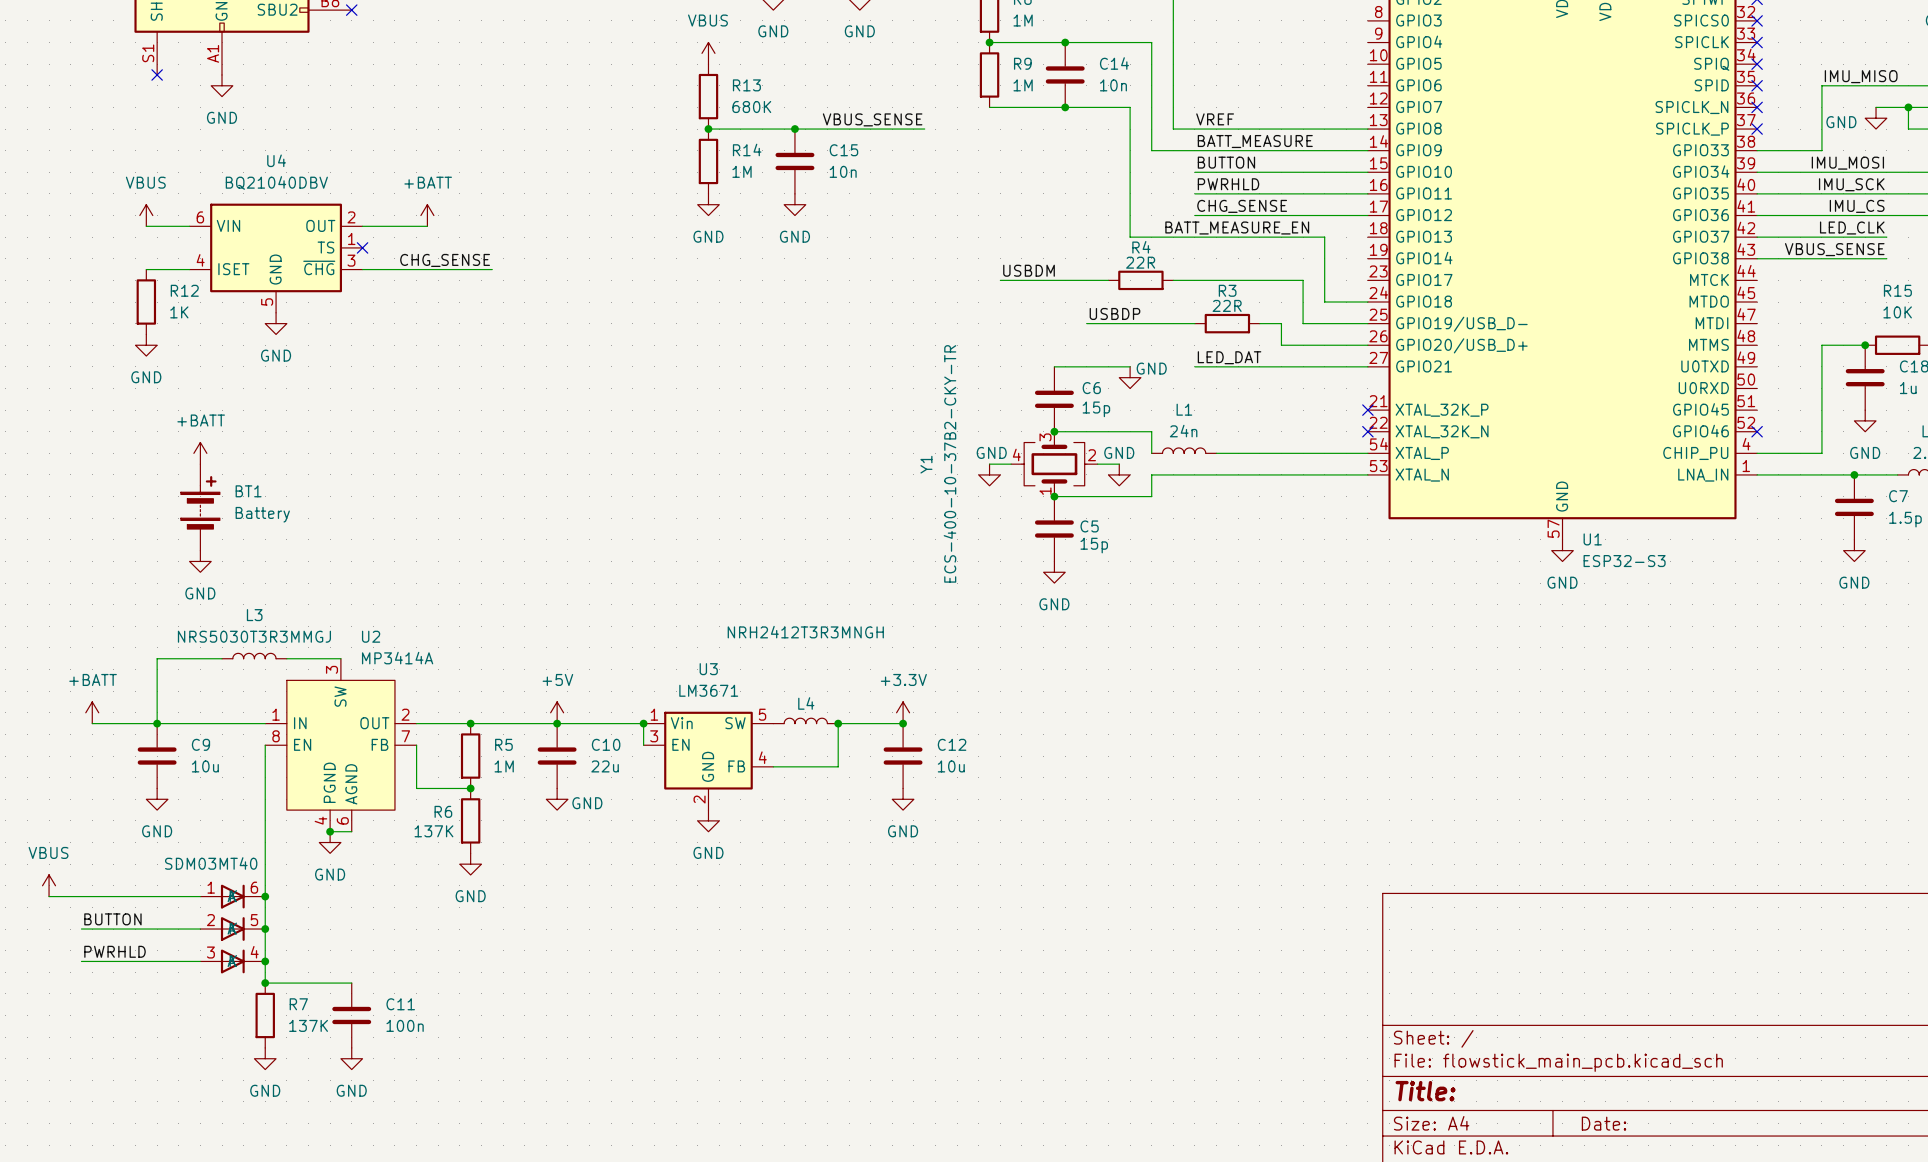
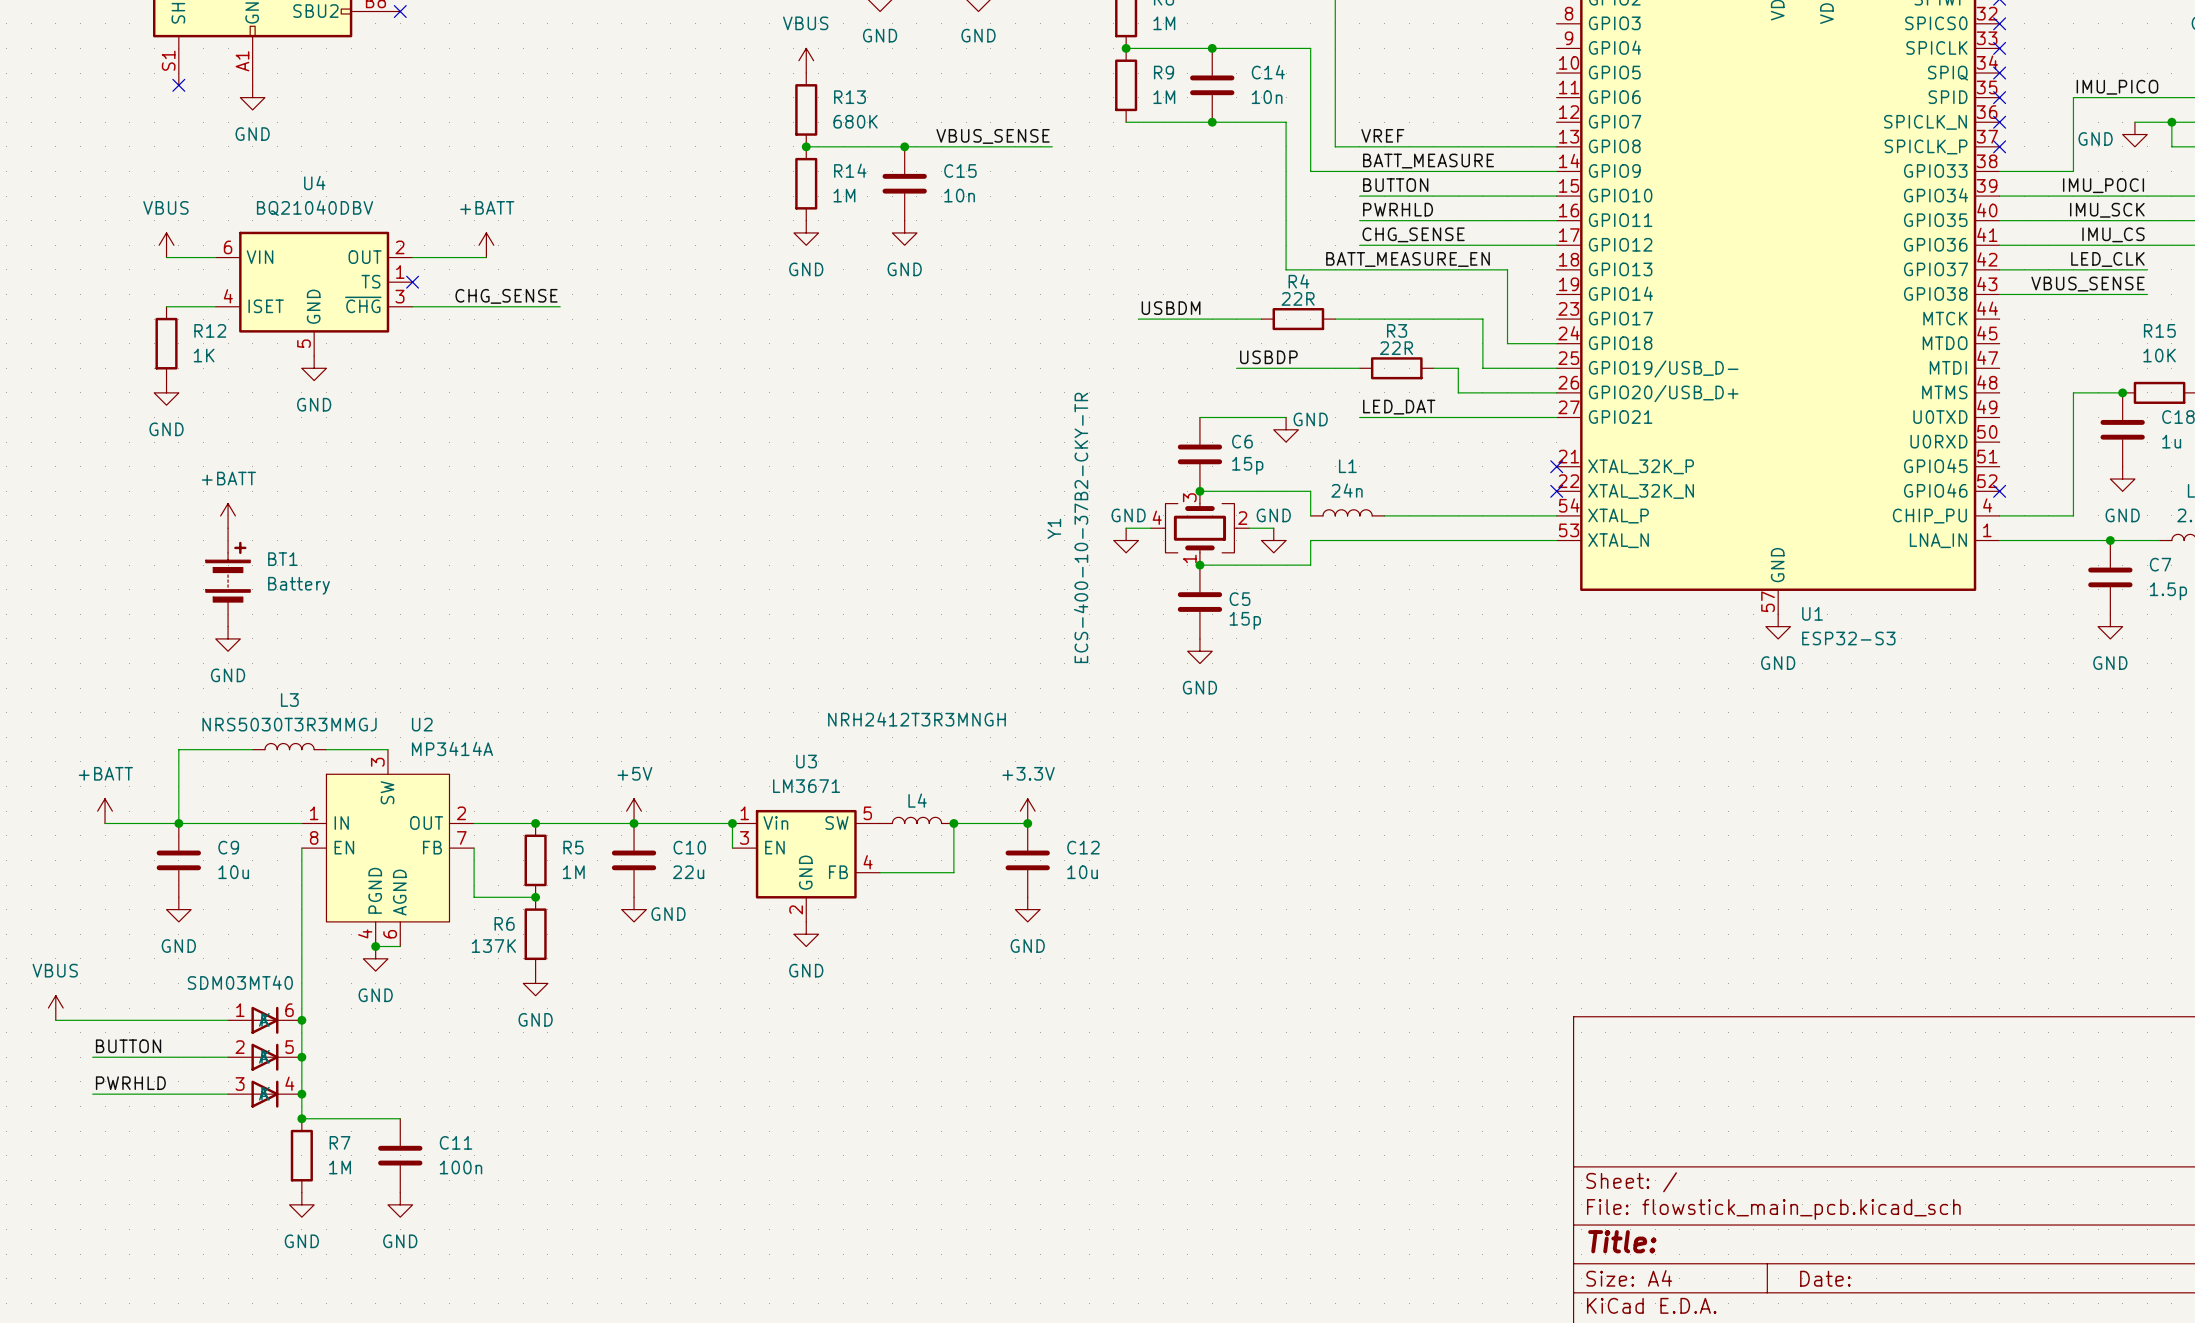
label: IMU_MISO (1861, 76) -> IMU_PICO (2117, 87)
label: IMU_MOSI (1847, 163) -> IMU_POCI (2103, 185)
R7 value: 137K (308, 1025) -> 1M (340, 1167)

